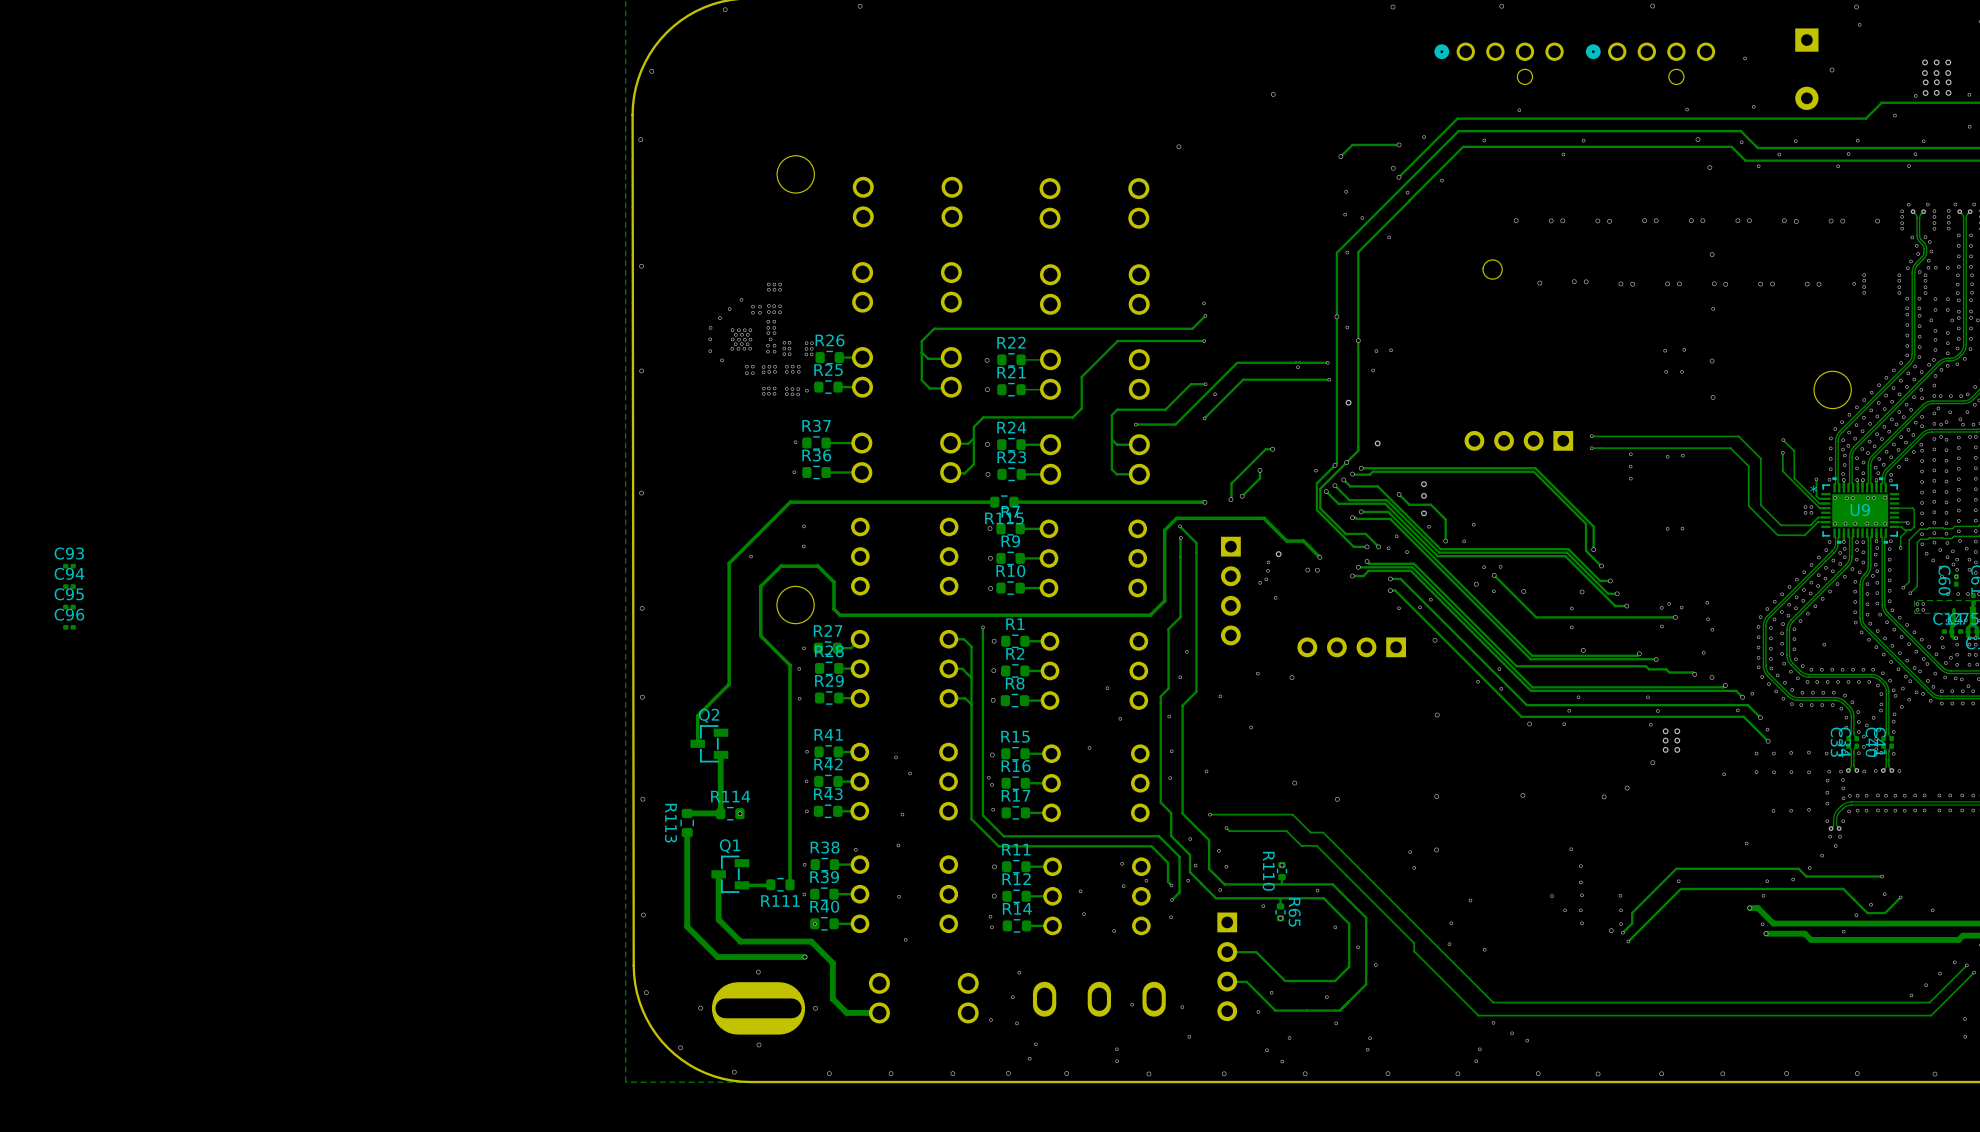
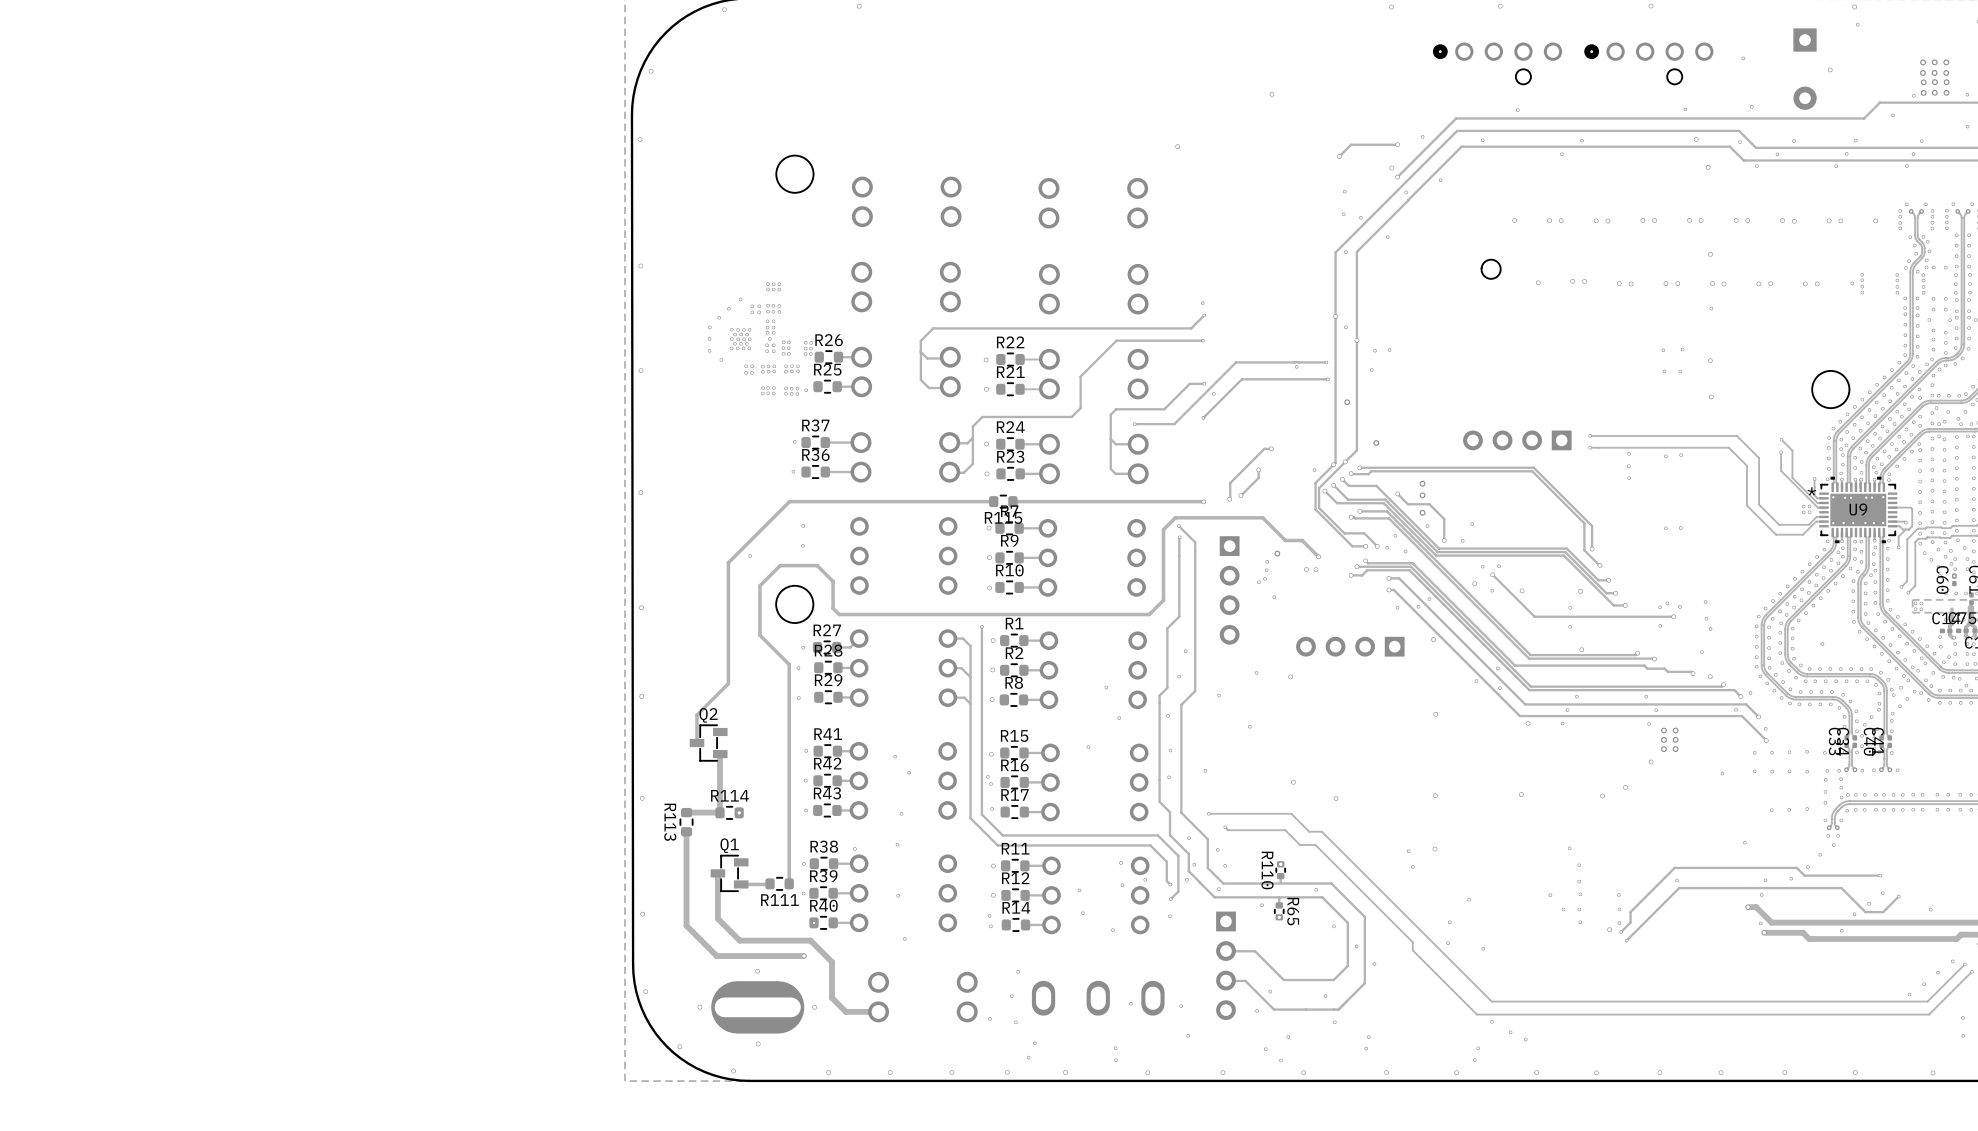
C93: (69, 566) -> none
C94: (69, 586) -> none
C95: (69, 606) -> none
C96: (69, 627) -> none

